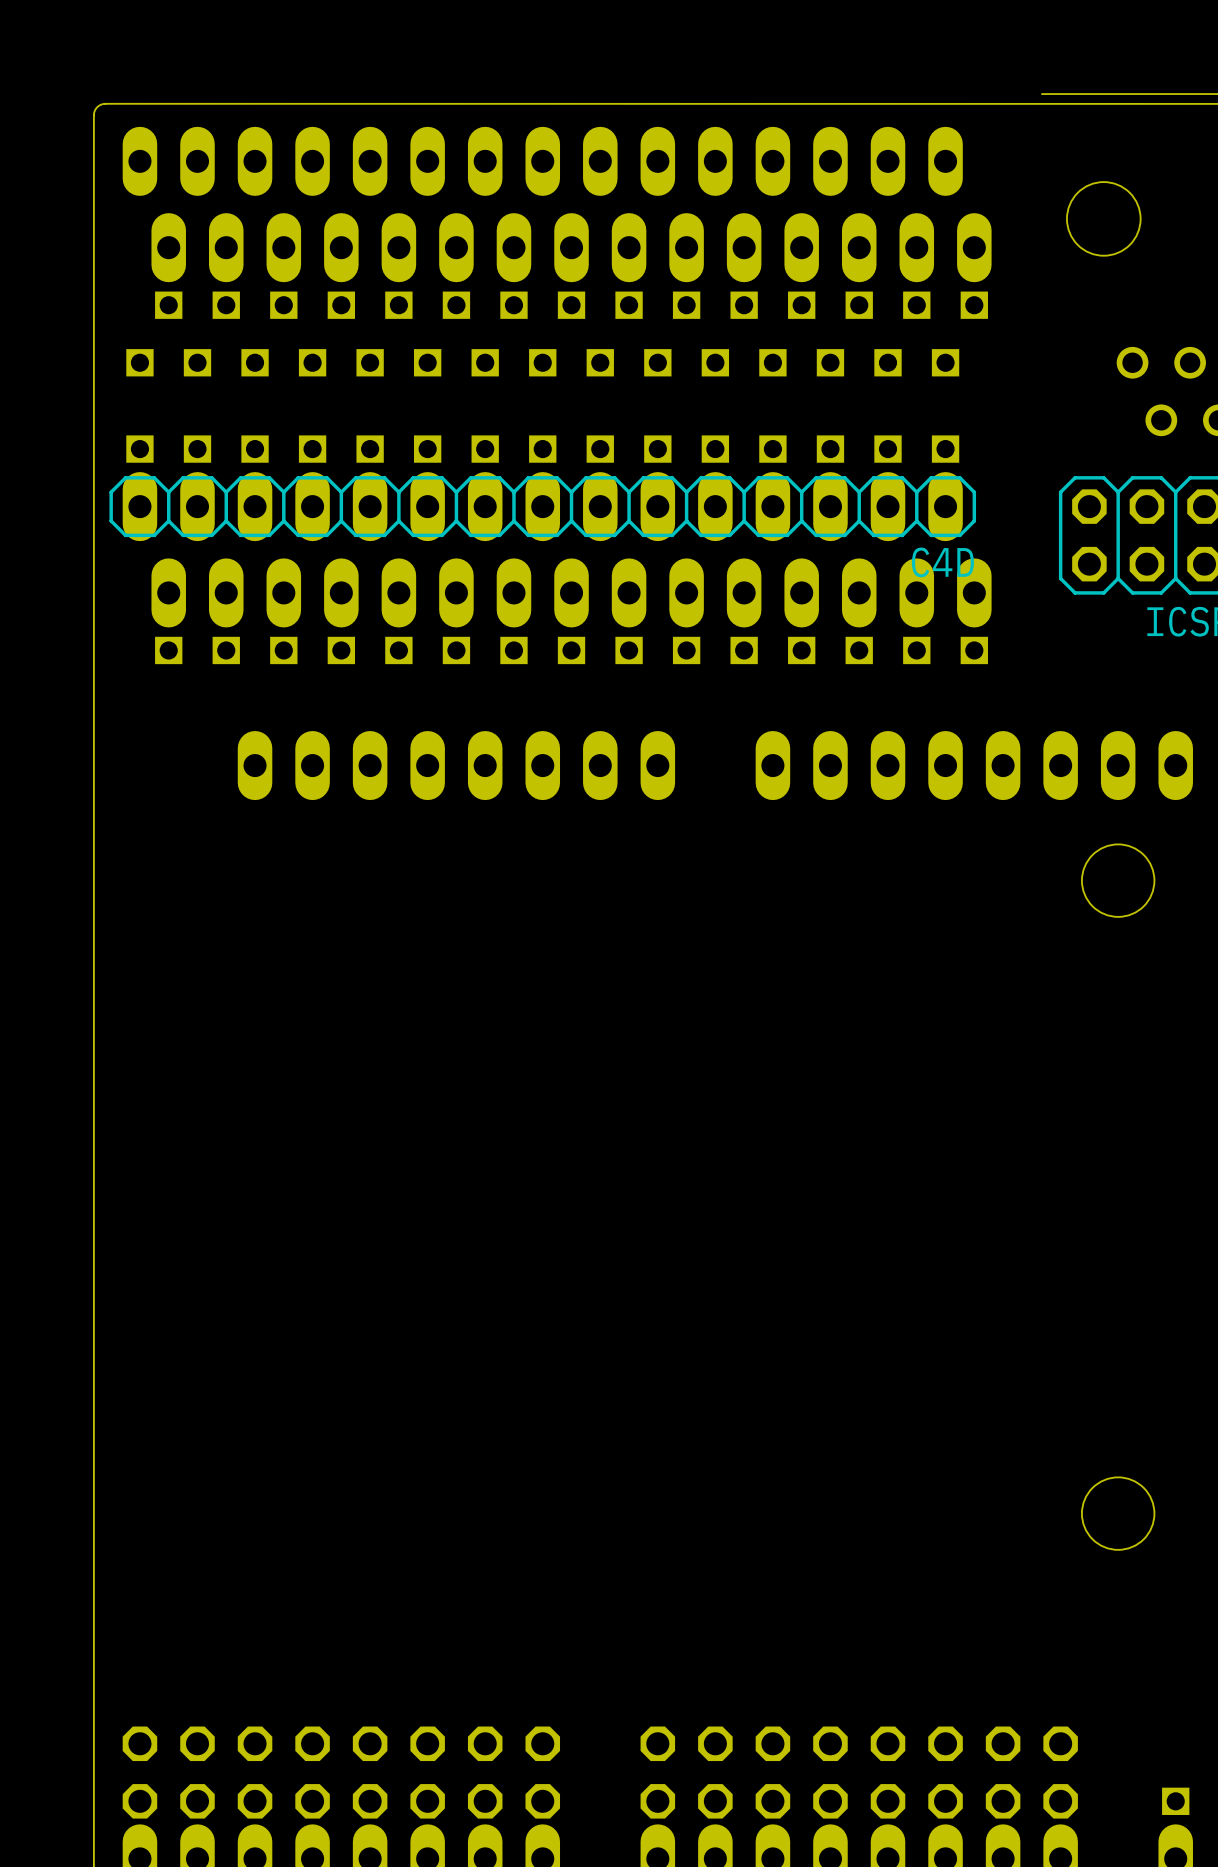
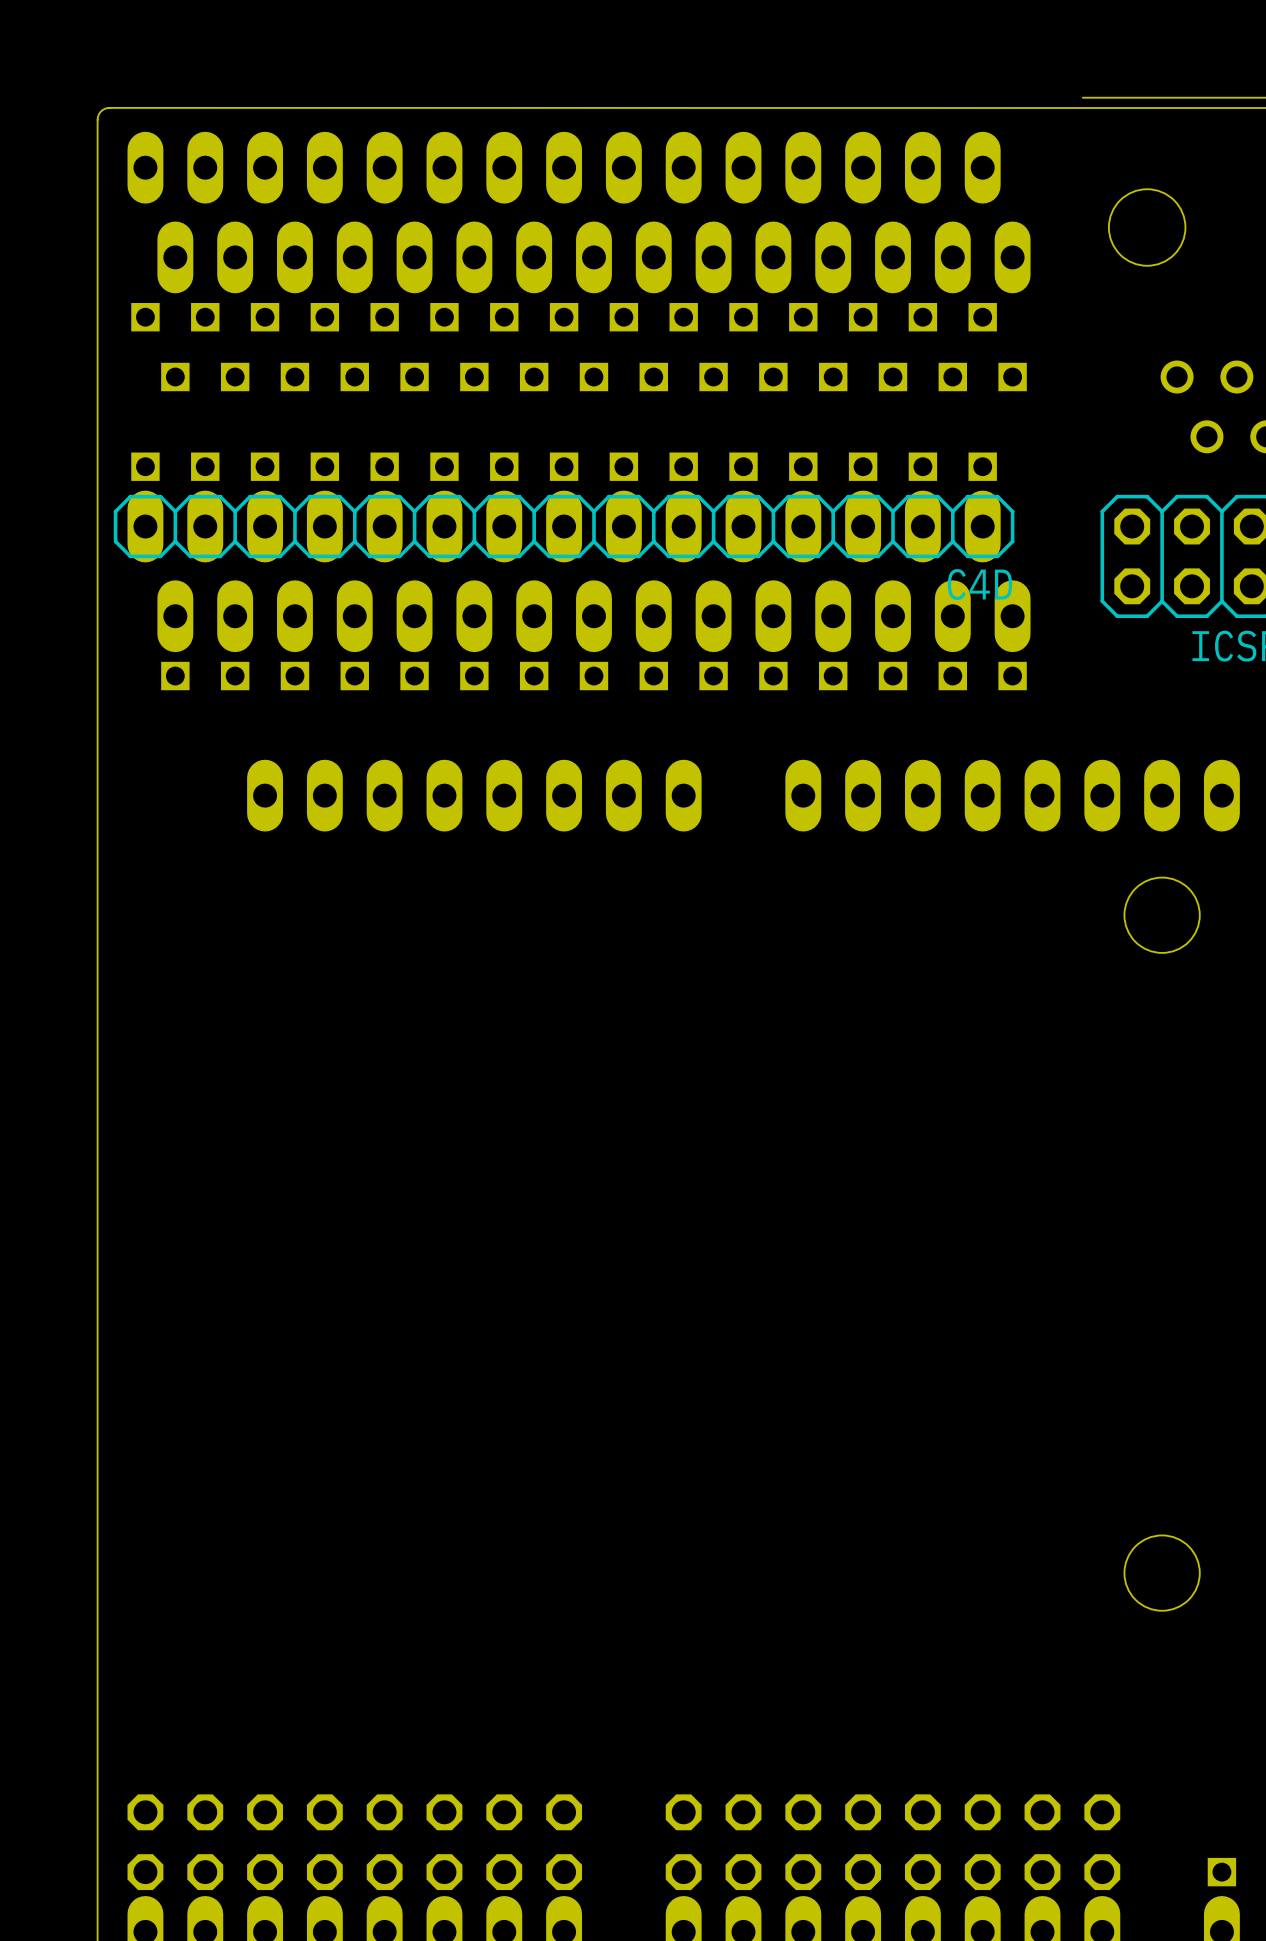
part: none -> (564, 317)
part: (571, 305) -> none
part: (542, 362) -> none
part: none -> (593, 377)

